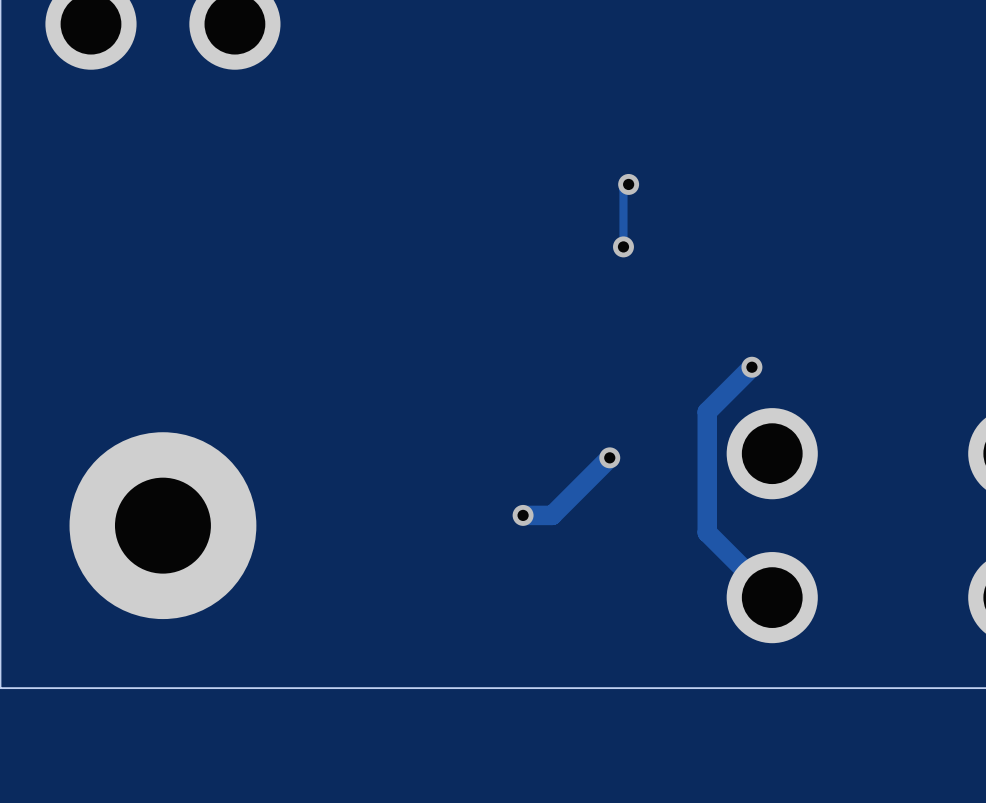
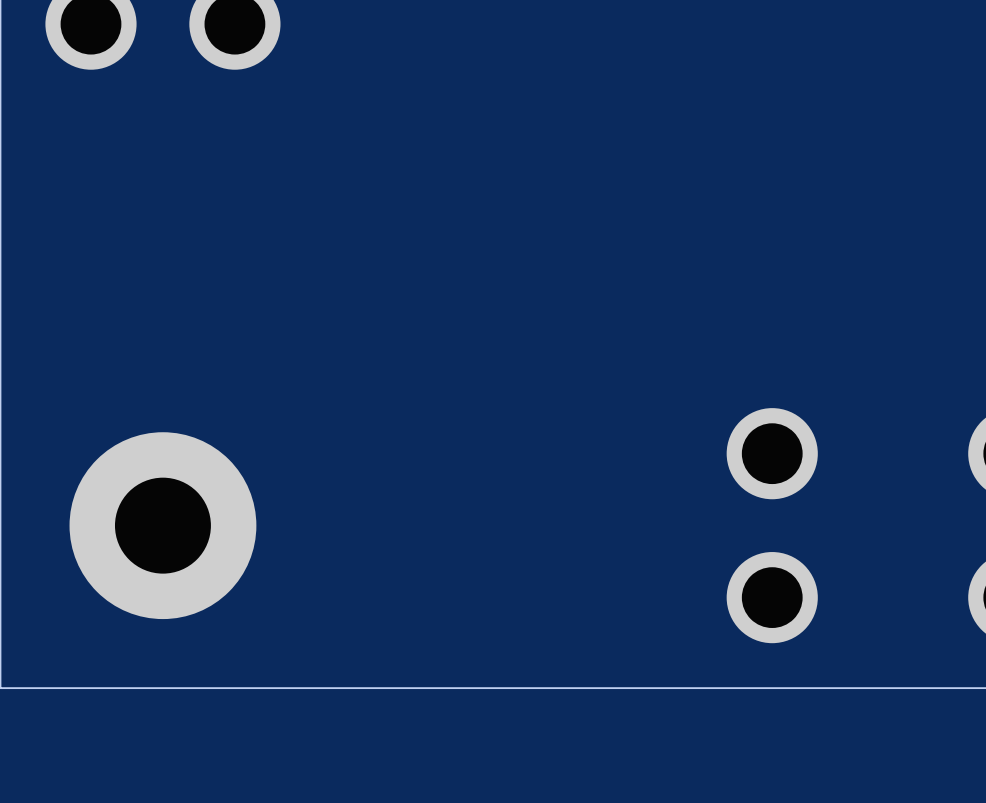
track: (628, 184) (623, 189) (623, 246) -> none
via: (628, 184) -> none
via: (623, 246) -> none
track: (751, 367) (707, 411) (707, 532) (772, 597) -> none
via: (751, 367) -> none
track: (609, 457) (552, 515) (523, 515) -> none
via: (609, 457) -> none
via: (523, 515) -> none

